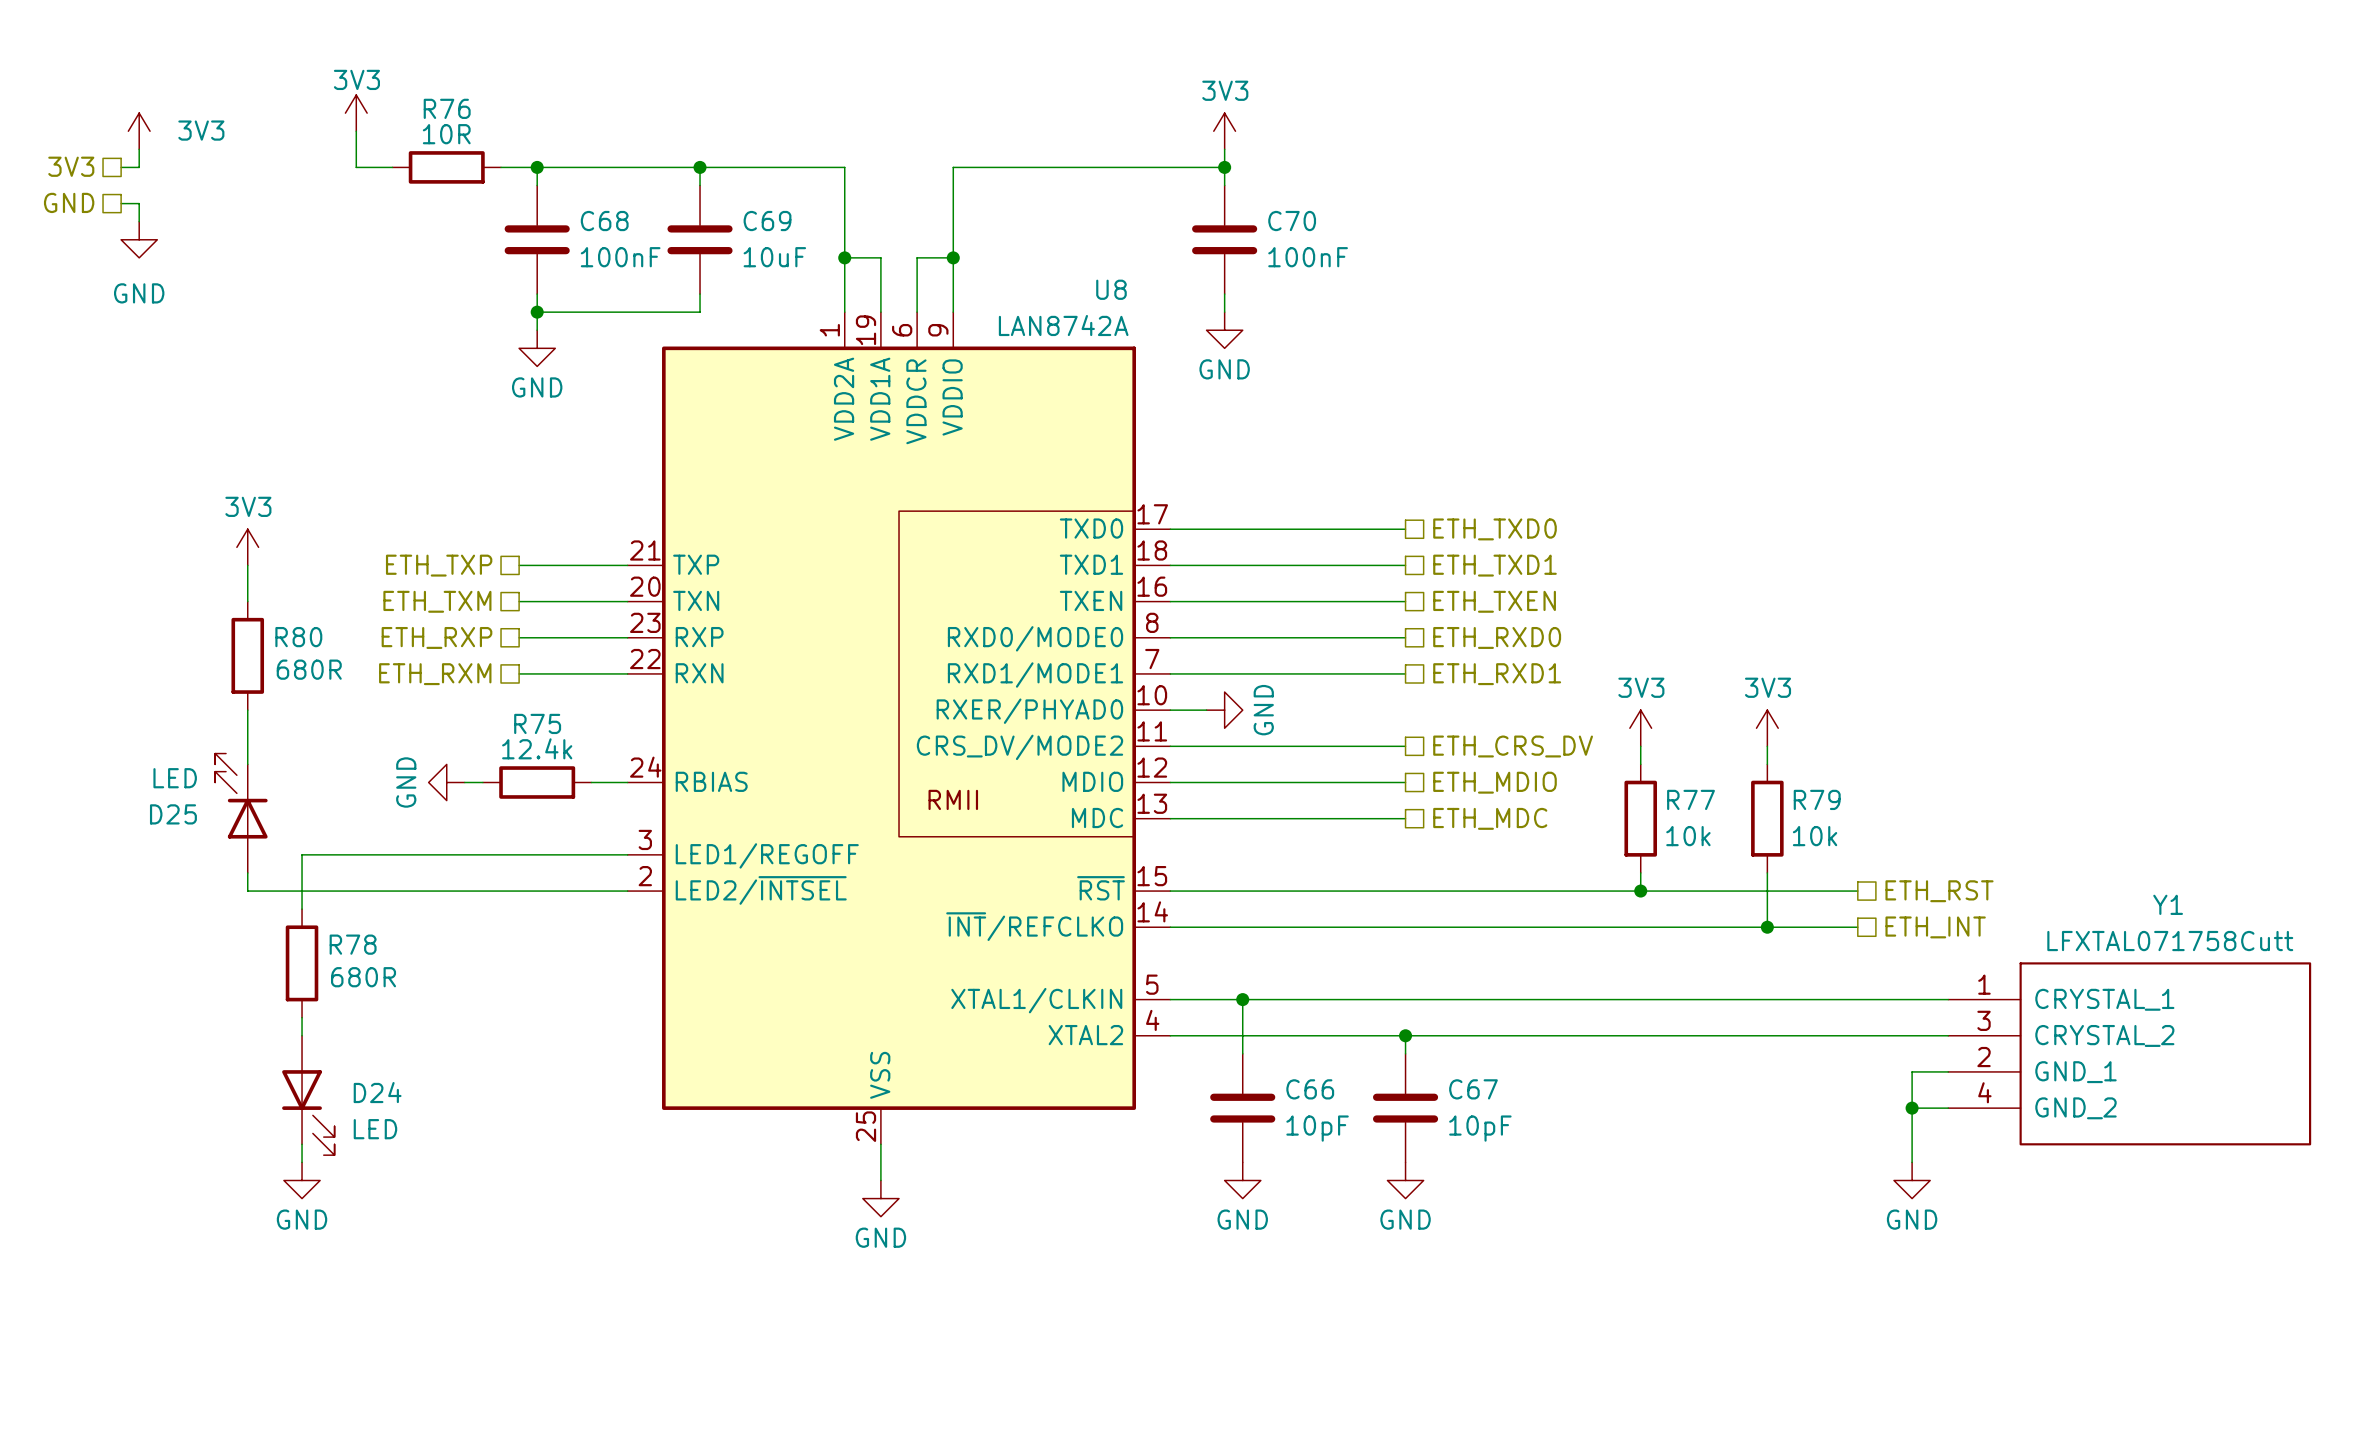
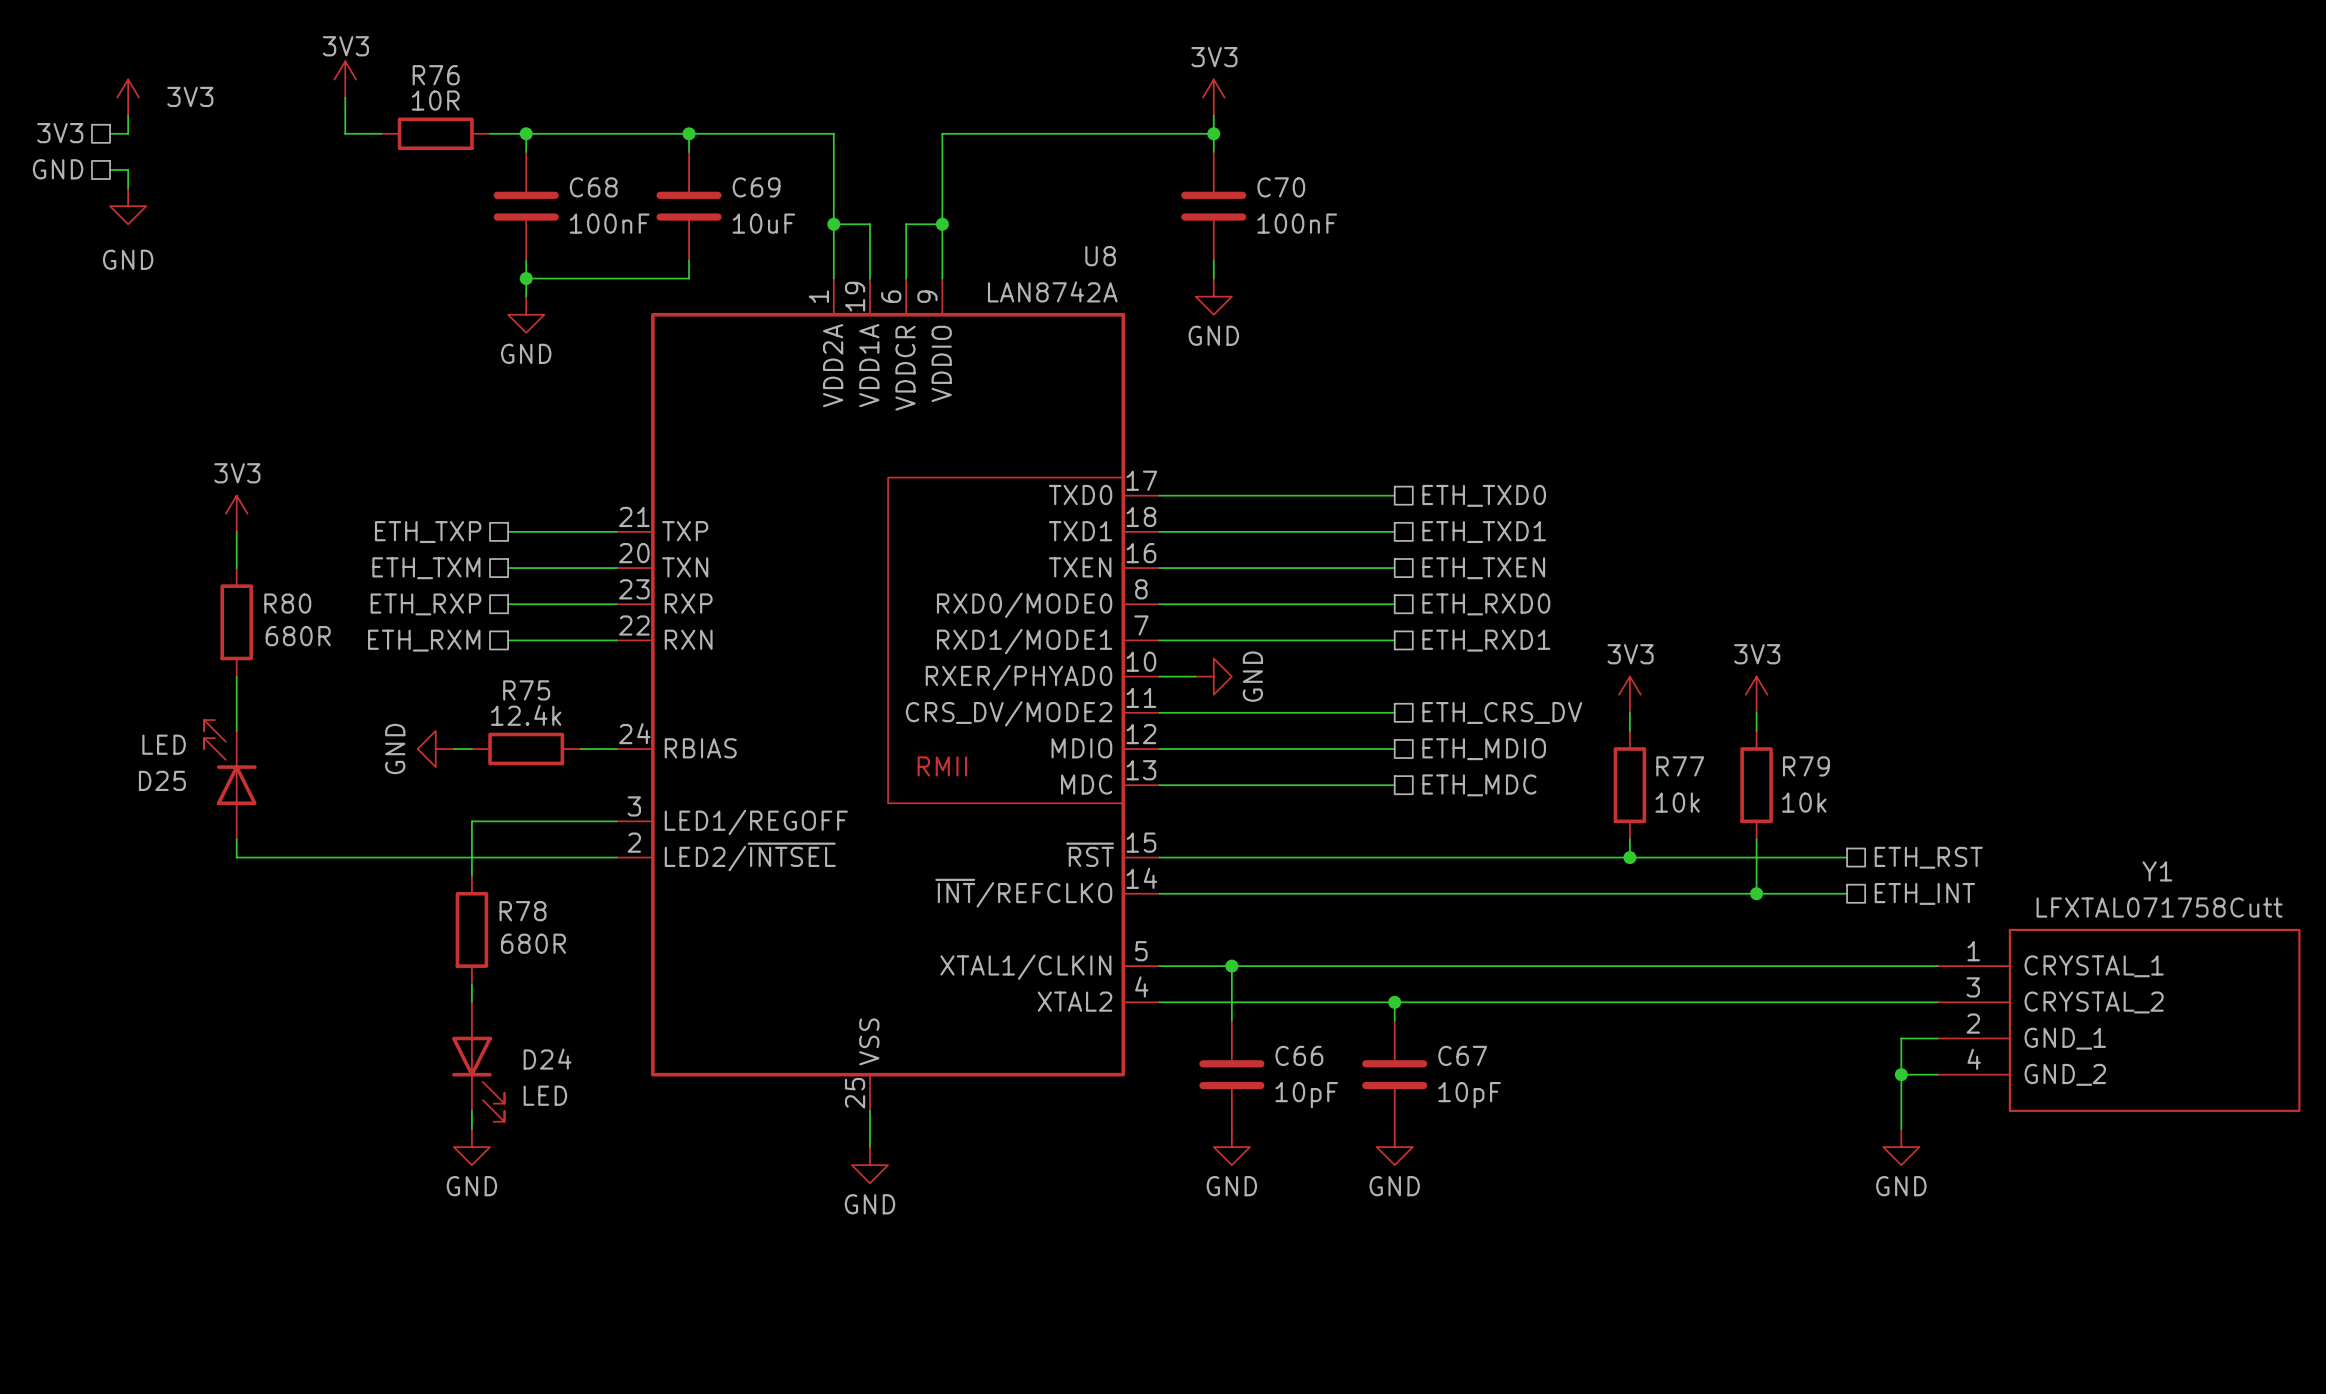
wire: (482, 854) (302, 854) (302, 909) -> (471, 821) (471, 875)
R78 position: (302, 963) -> (471, 929)
wire: (302, 1017) (302, 1035) -> (471, 984) (471, 1002)
D24 position: (308, 1095) -> (478, 1062)
wire: (302, 1144) (302, 1162) -> (471, 1110) (471, 1128)
power symbol position: GND (302, 1180) -> GND (471, 1147)

